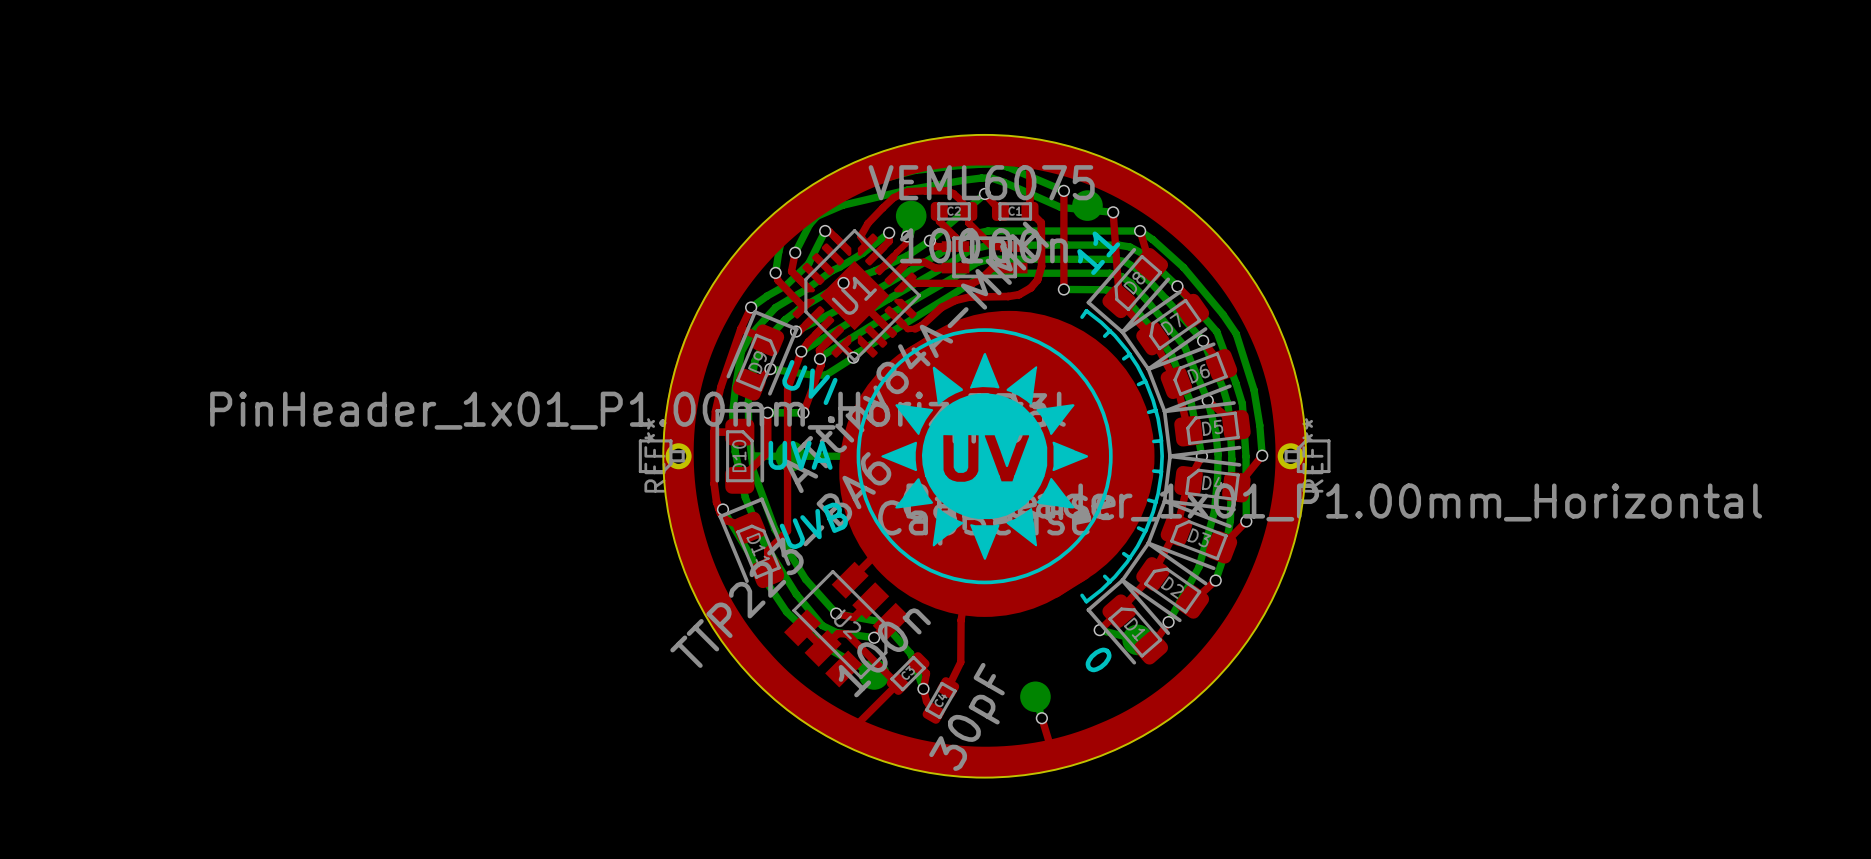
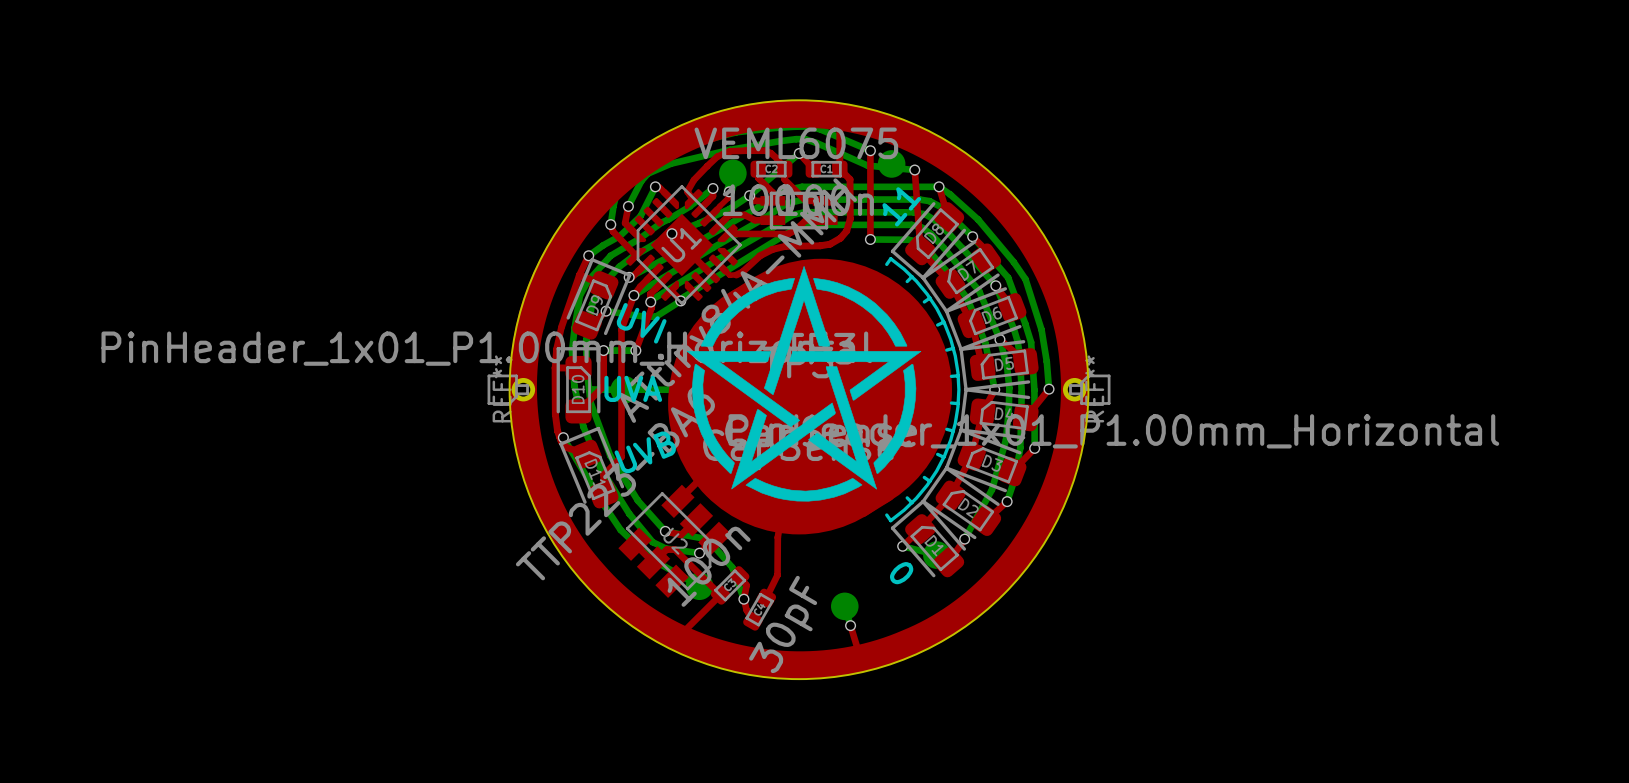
drawing: none -> [686, 266, 922, 502]
drawing: [856, 328, 1113, 585] -> none

